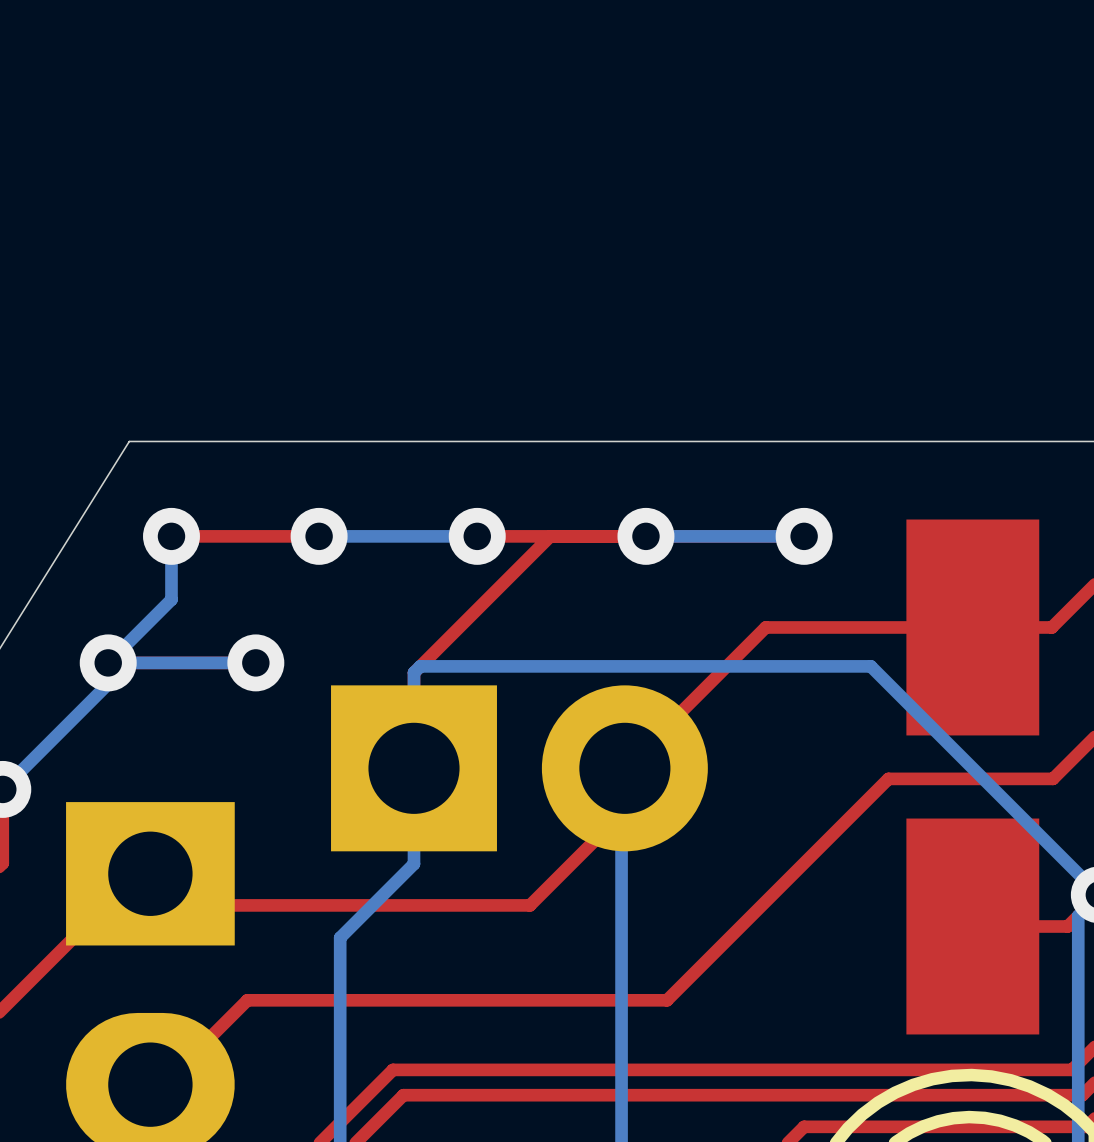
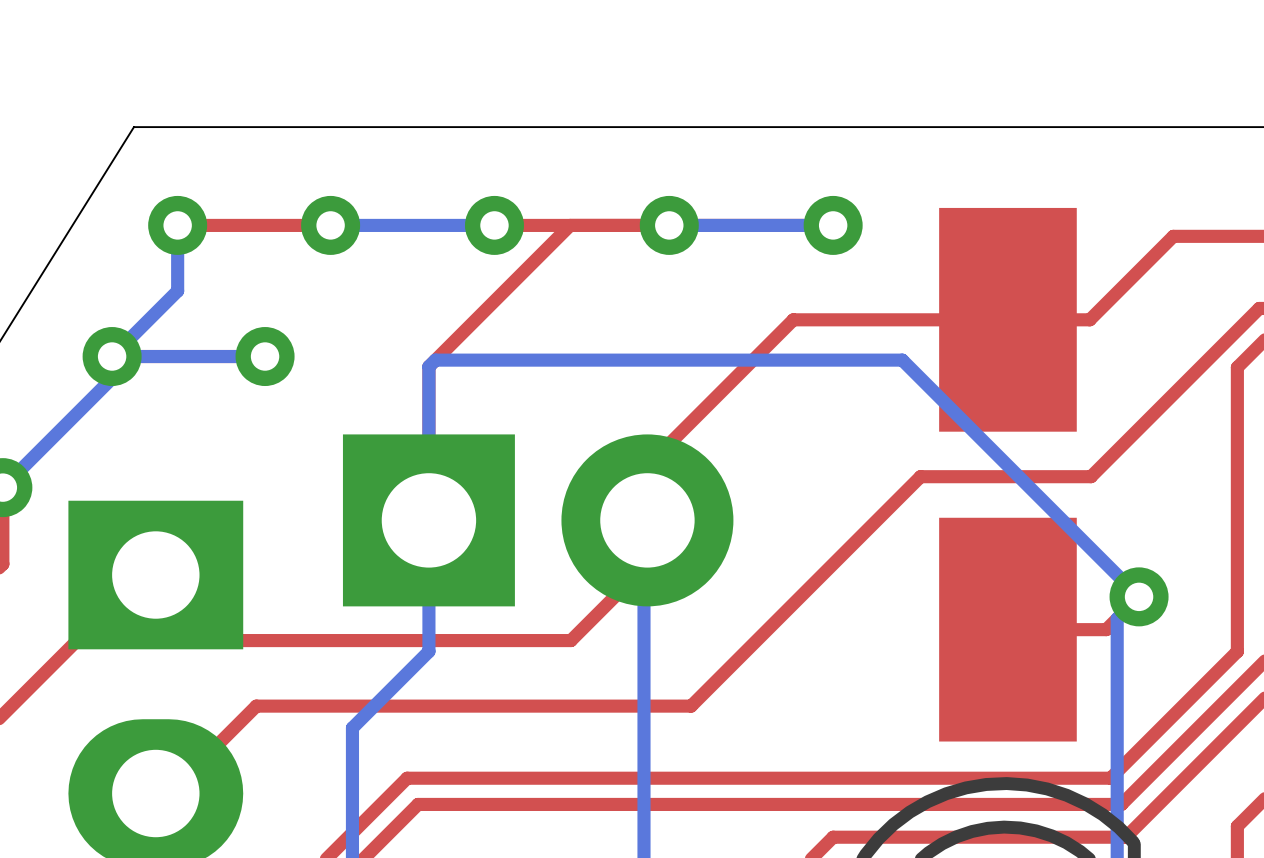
part position: (519, 768) -> (538, 520)
top track: (624, 810) (529, 905) (182, 905) -> (647, 509) (647, 564) (570, 640) (221, 640) (188, 607)
bottom track: (413, 863) (340, 937) (340, 1021) -> (428, 564) (428, 651) (352, 727)

